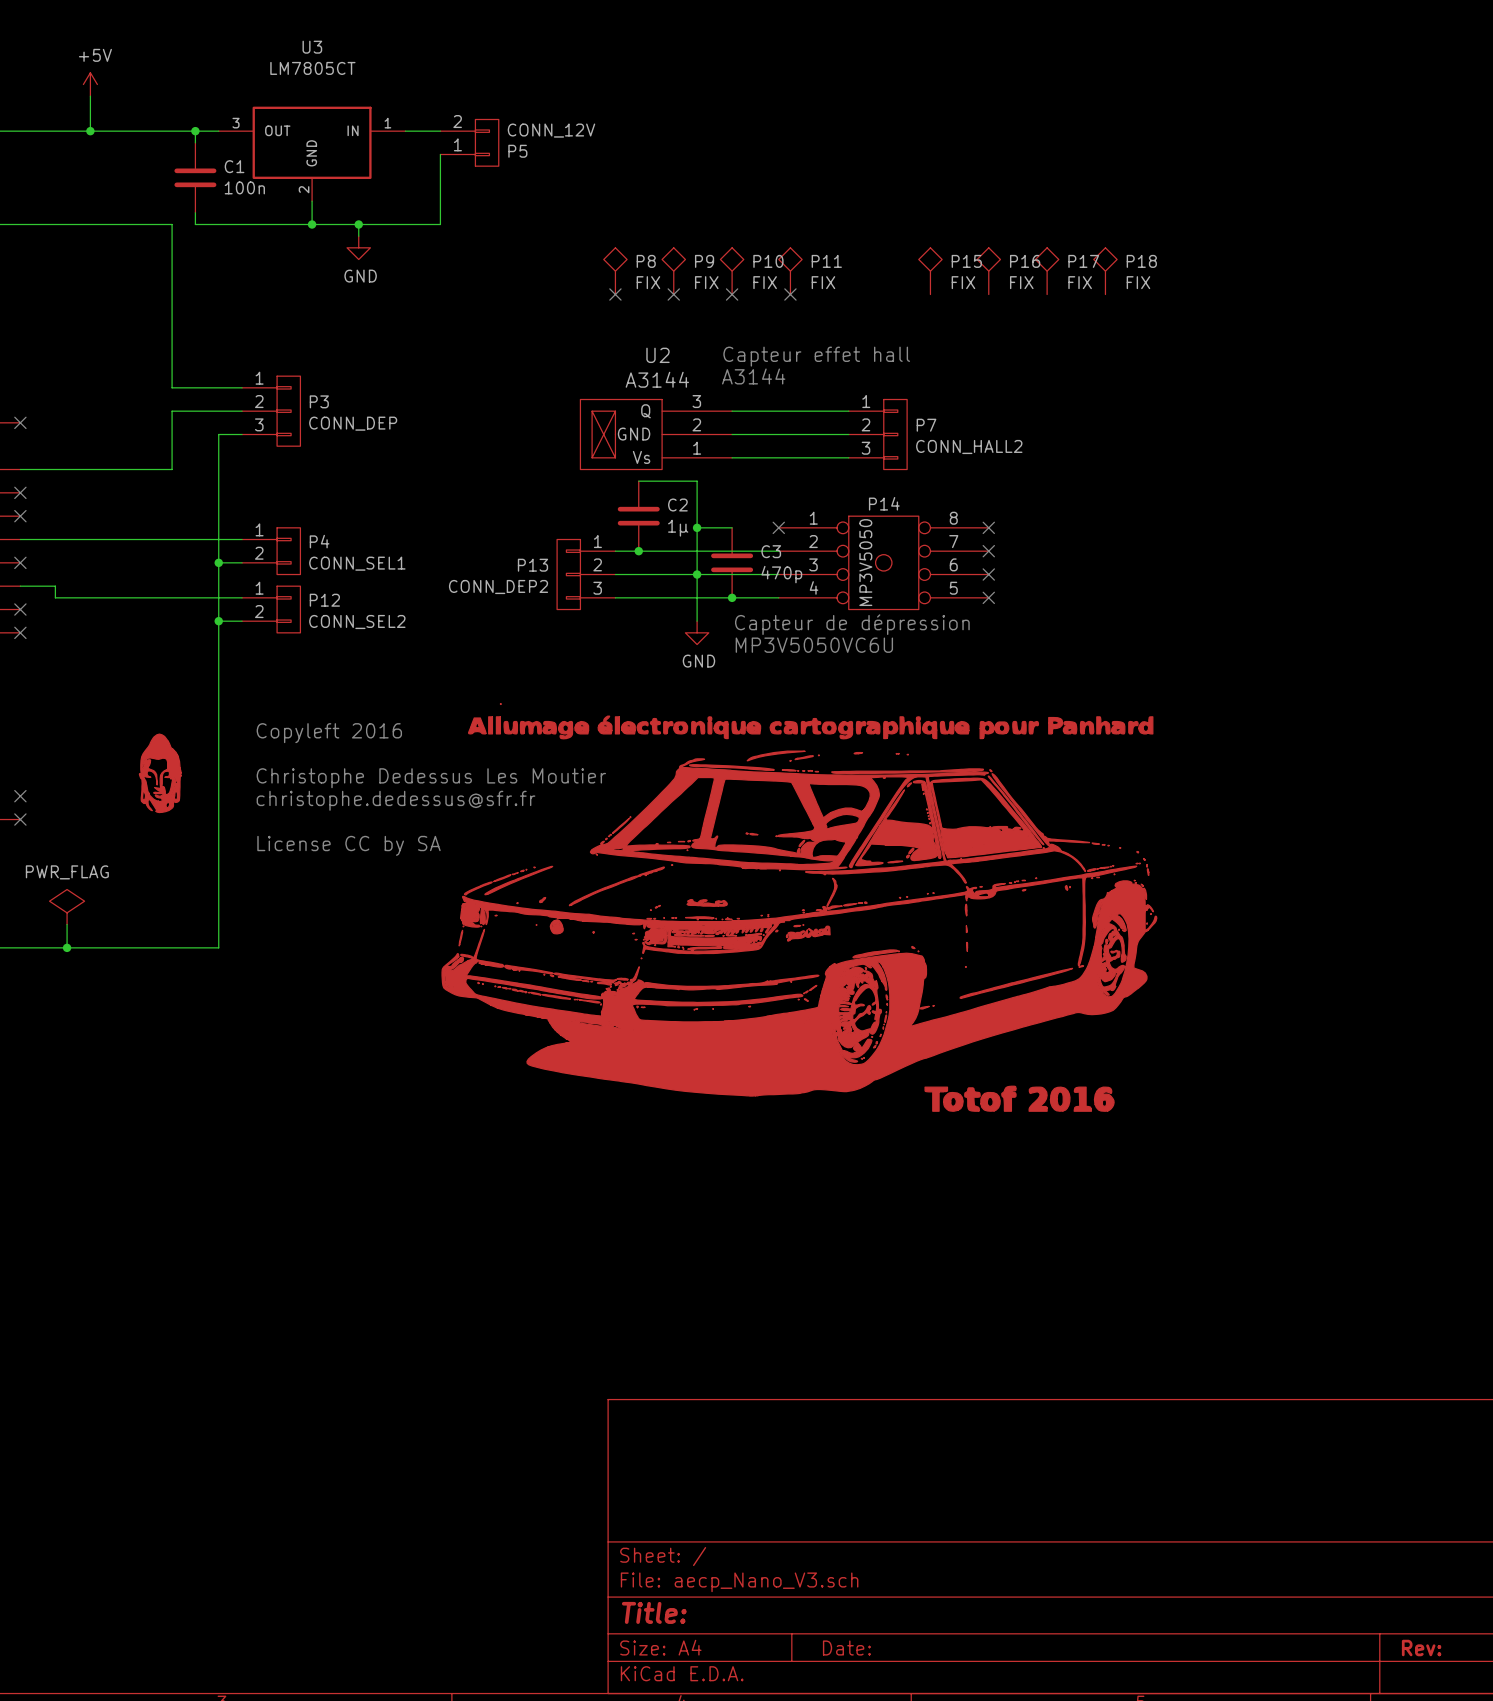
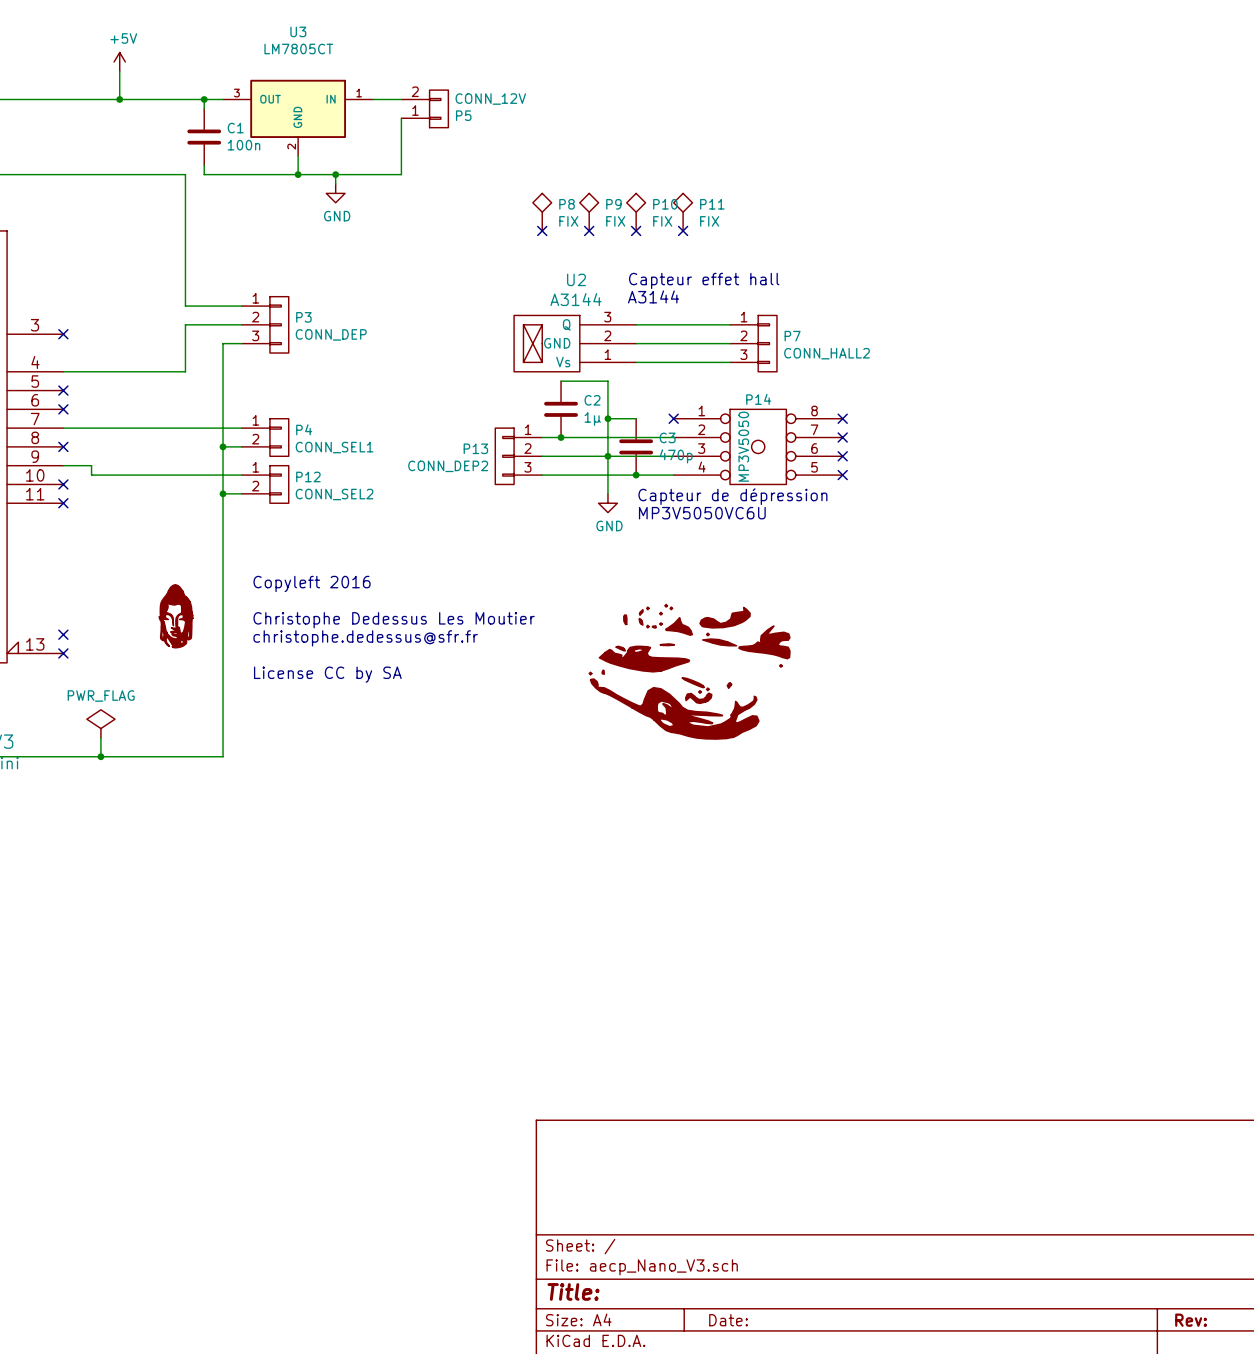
P15: FIX (930, 271) -> none
P16: FIX (988, 271) -> none
P17: FIX (1047, 271) -> none
P18: FIX (1105, 271) -> none
part: none -> (689, 671)
part: (799, 907) -> none

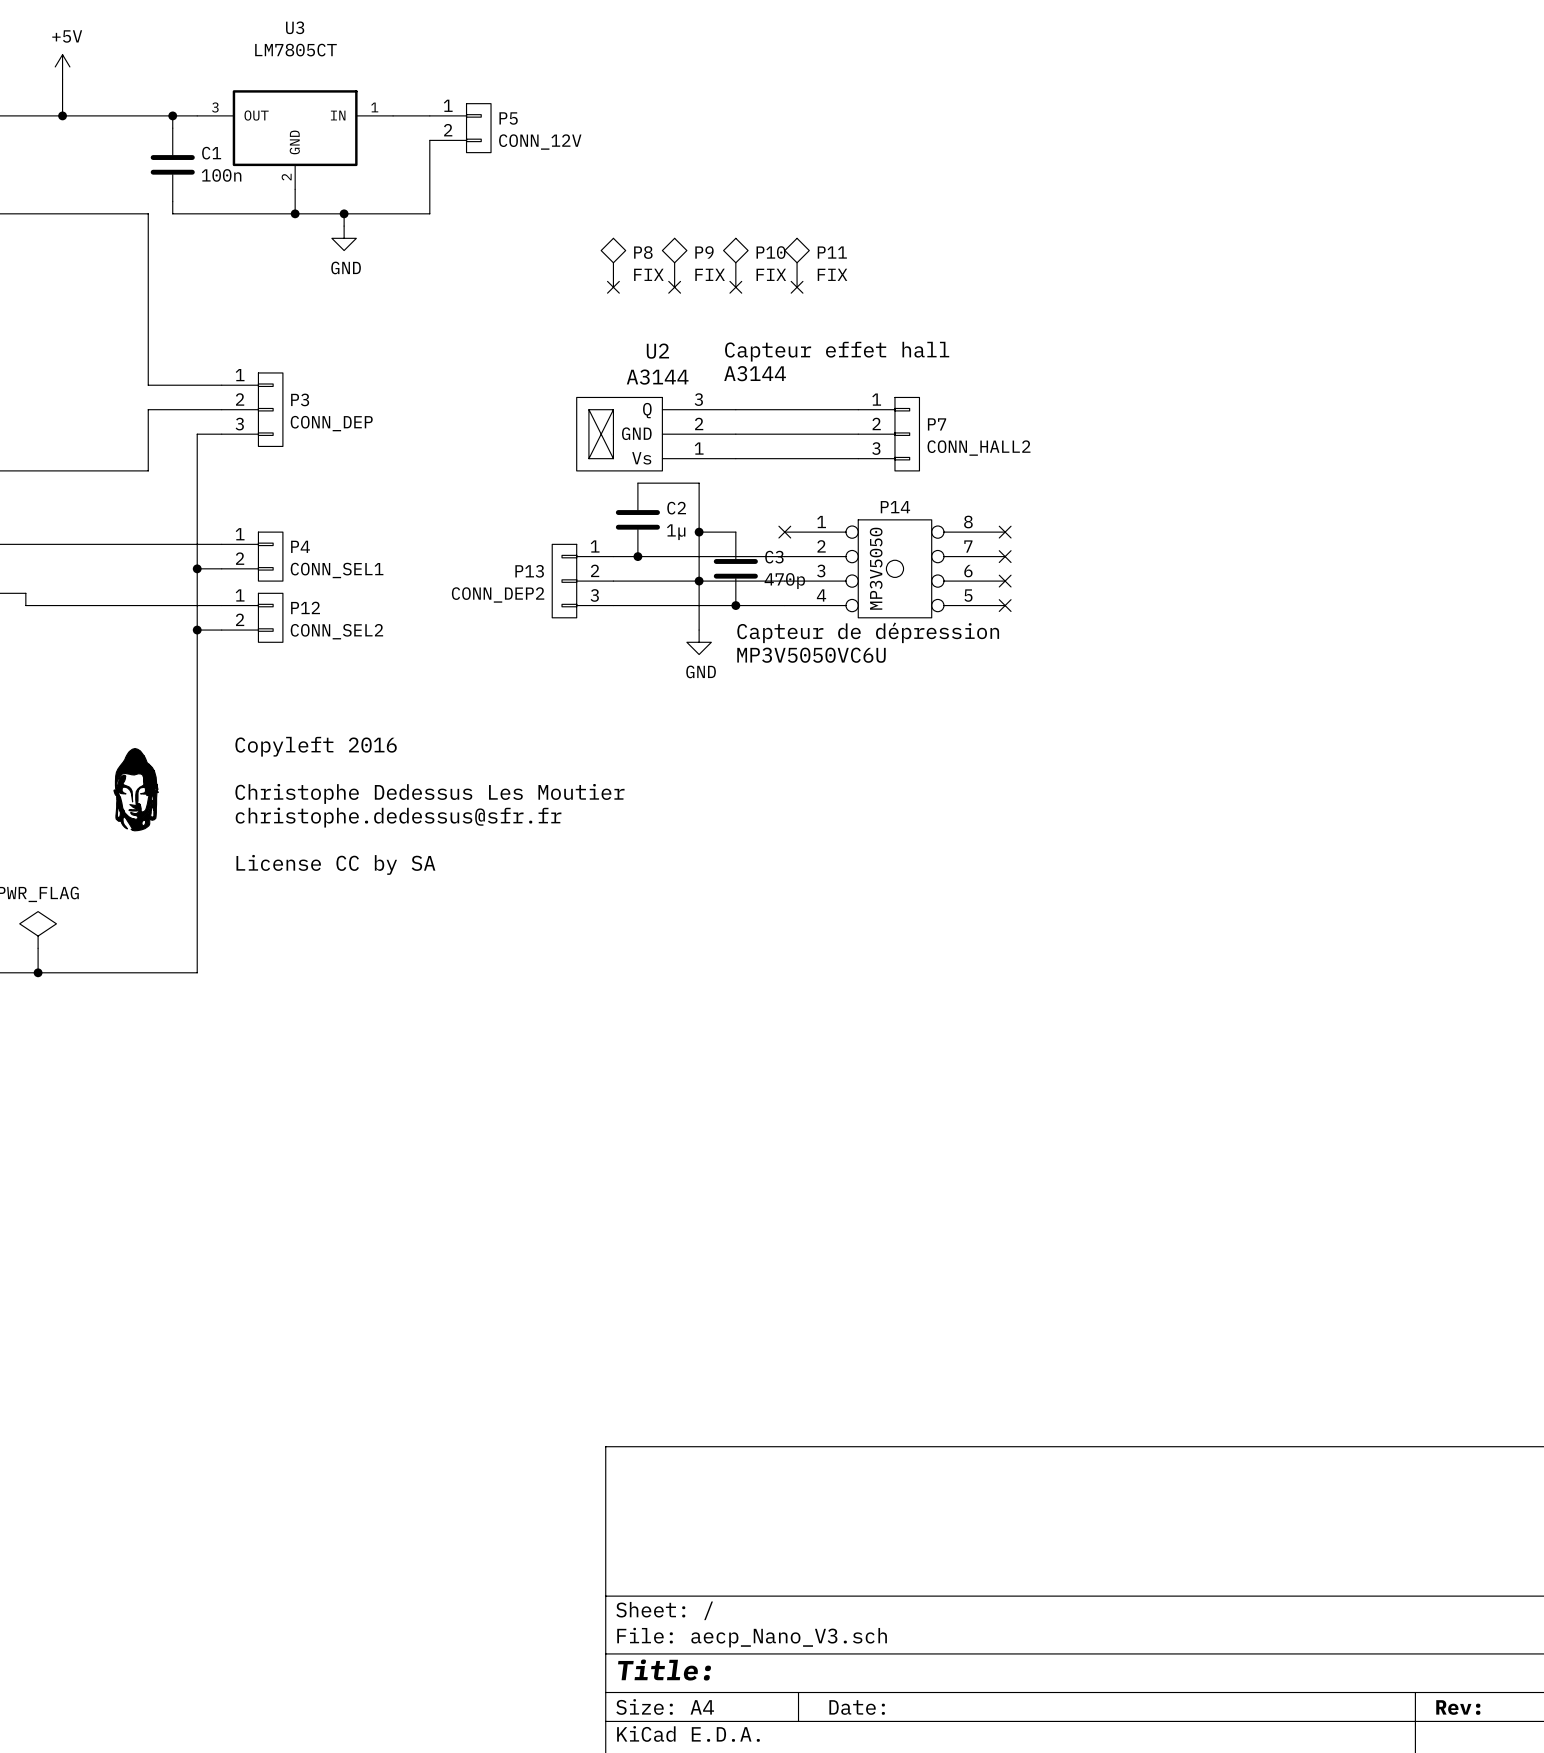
P5 flip: as is (438, 108) -> up-down (478, 128)
part: (689, 671) -> none

